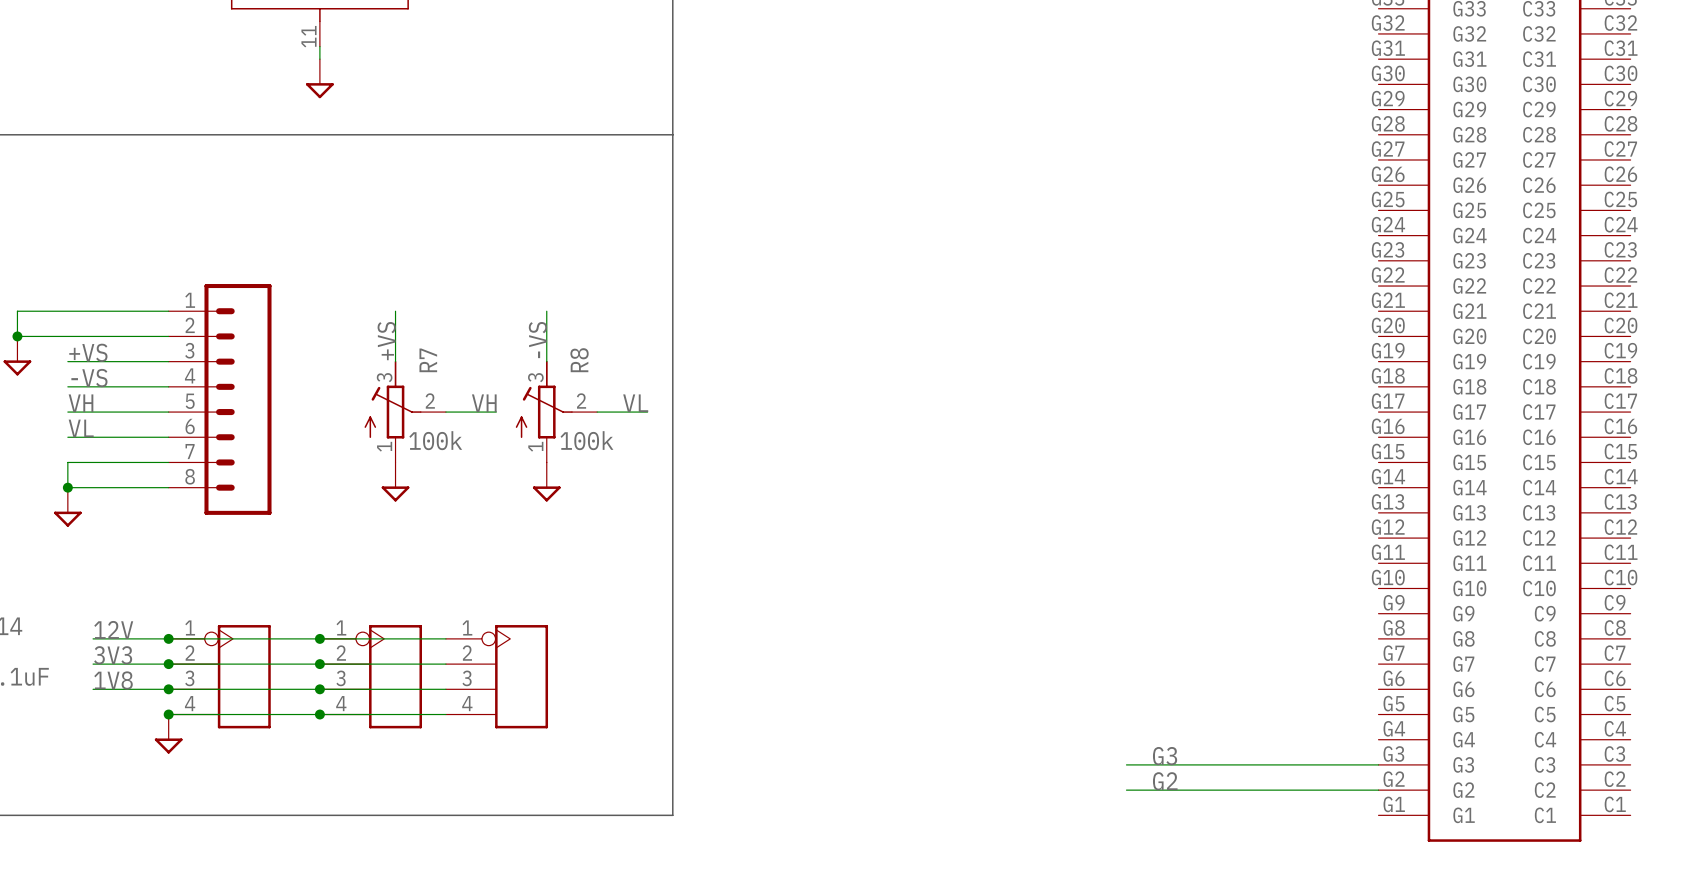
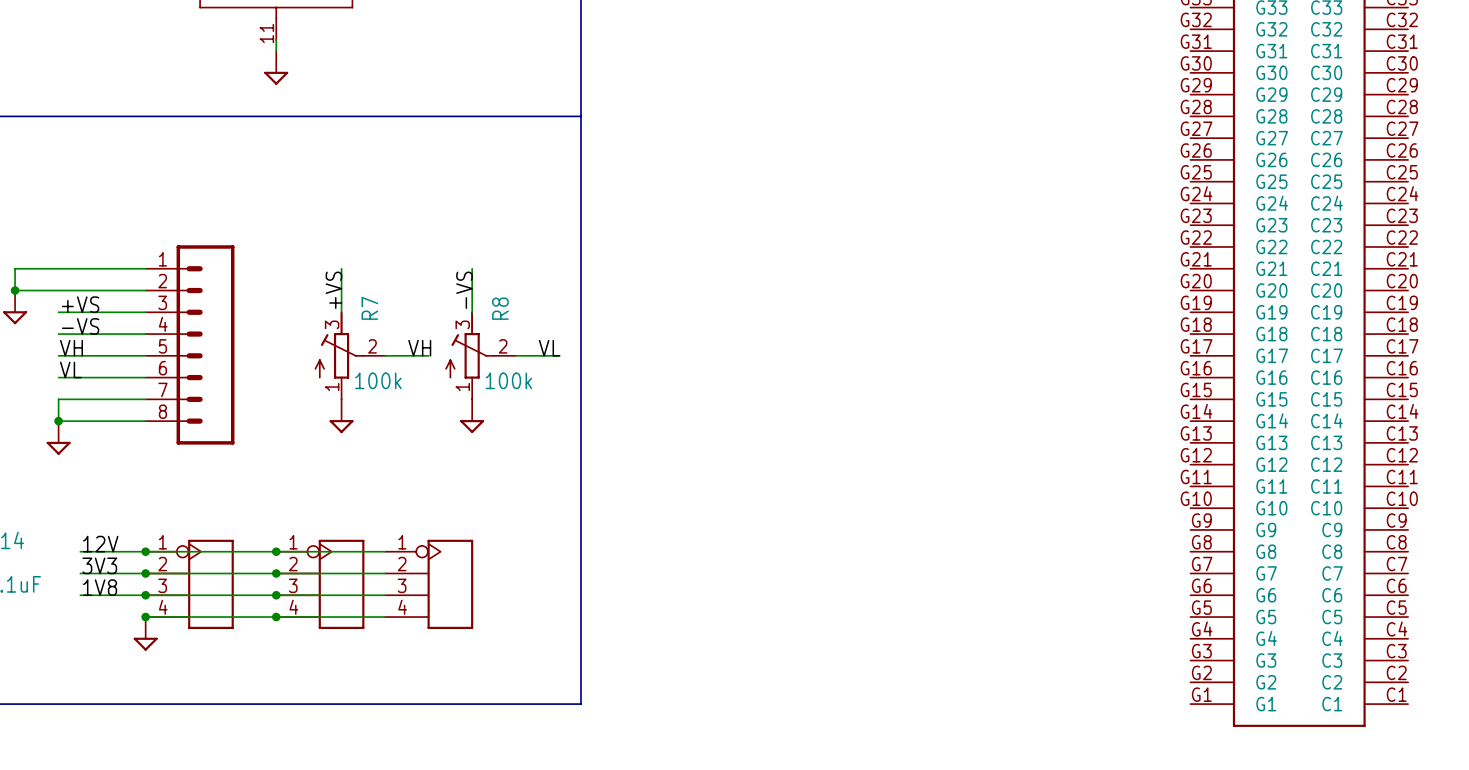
label: G3 (1165, 756) -> none
wire: (1126, 764) (1378, 764) -> none
label: G2 (1165, 781) -> none
wire: (1126, 790) (1378, 790) -> none

